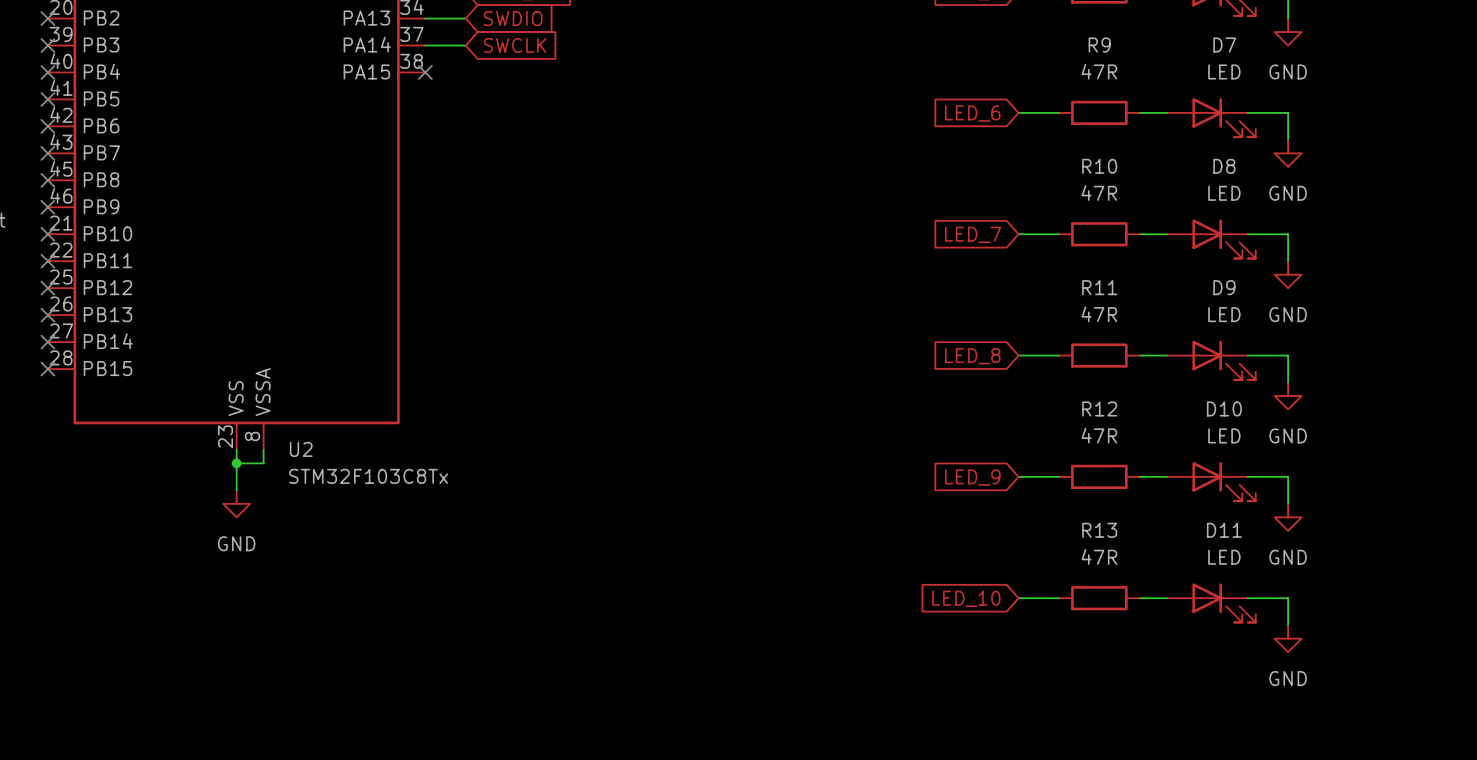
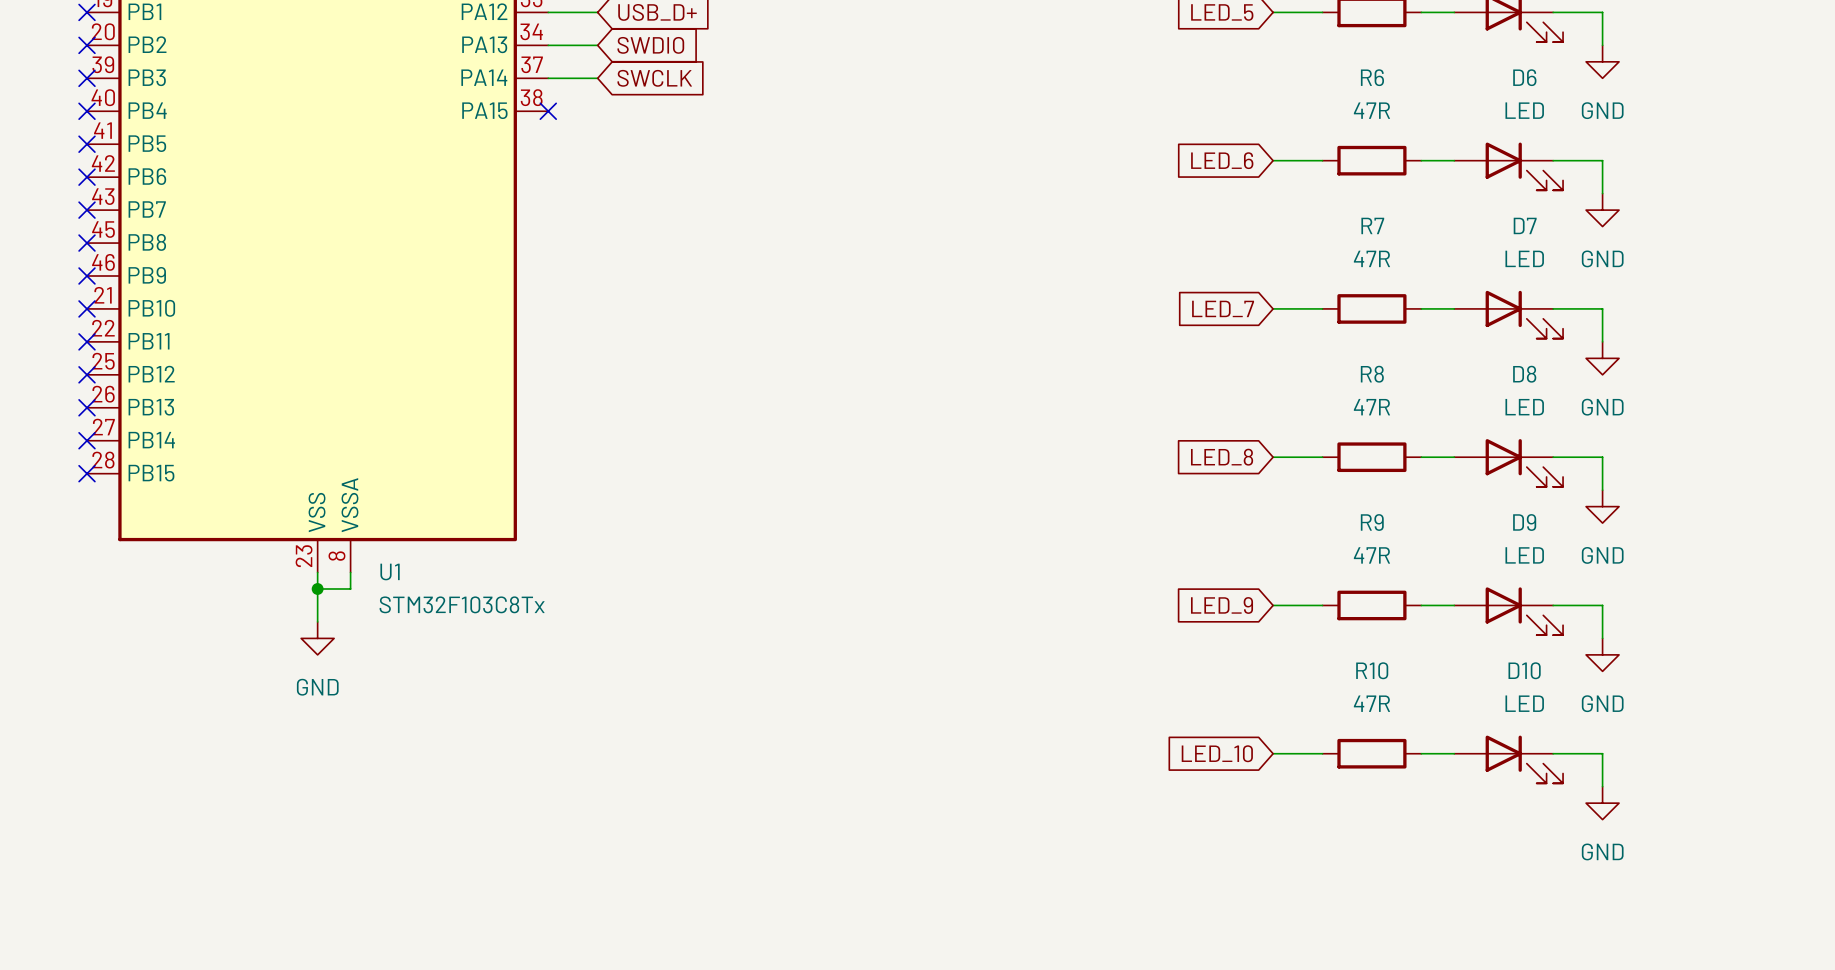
R9 name: R9 (1099, 45) -> R6 (1372, 77)
D7 name: D7 (1224, 45) -> D6 (1524, 77)
R10 name: R10 (1099, 166) -> R7 (1372, 225)
D8 name: D8 (1224, 166) -> D7 (1525, 225)
R11 name: R11 (1099, 287) -> R8 (1372, 374)
D9 name: D9 (1224, 287) -> D8 (1524, 374)
R12 name: R12 (1099, 408) -> R9 (1372, 522)
D10 name: D10 (1224, 408) -> D9 (1524, 522)
U2 name: U2 (301, 449) -> U1 (390, 572)
R13 name: R13 (1099, 530) -> R10 (1372, 670)
D11 name: D11 (1224, 530) -> D10 (1524, 670)

